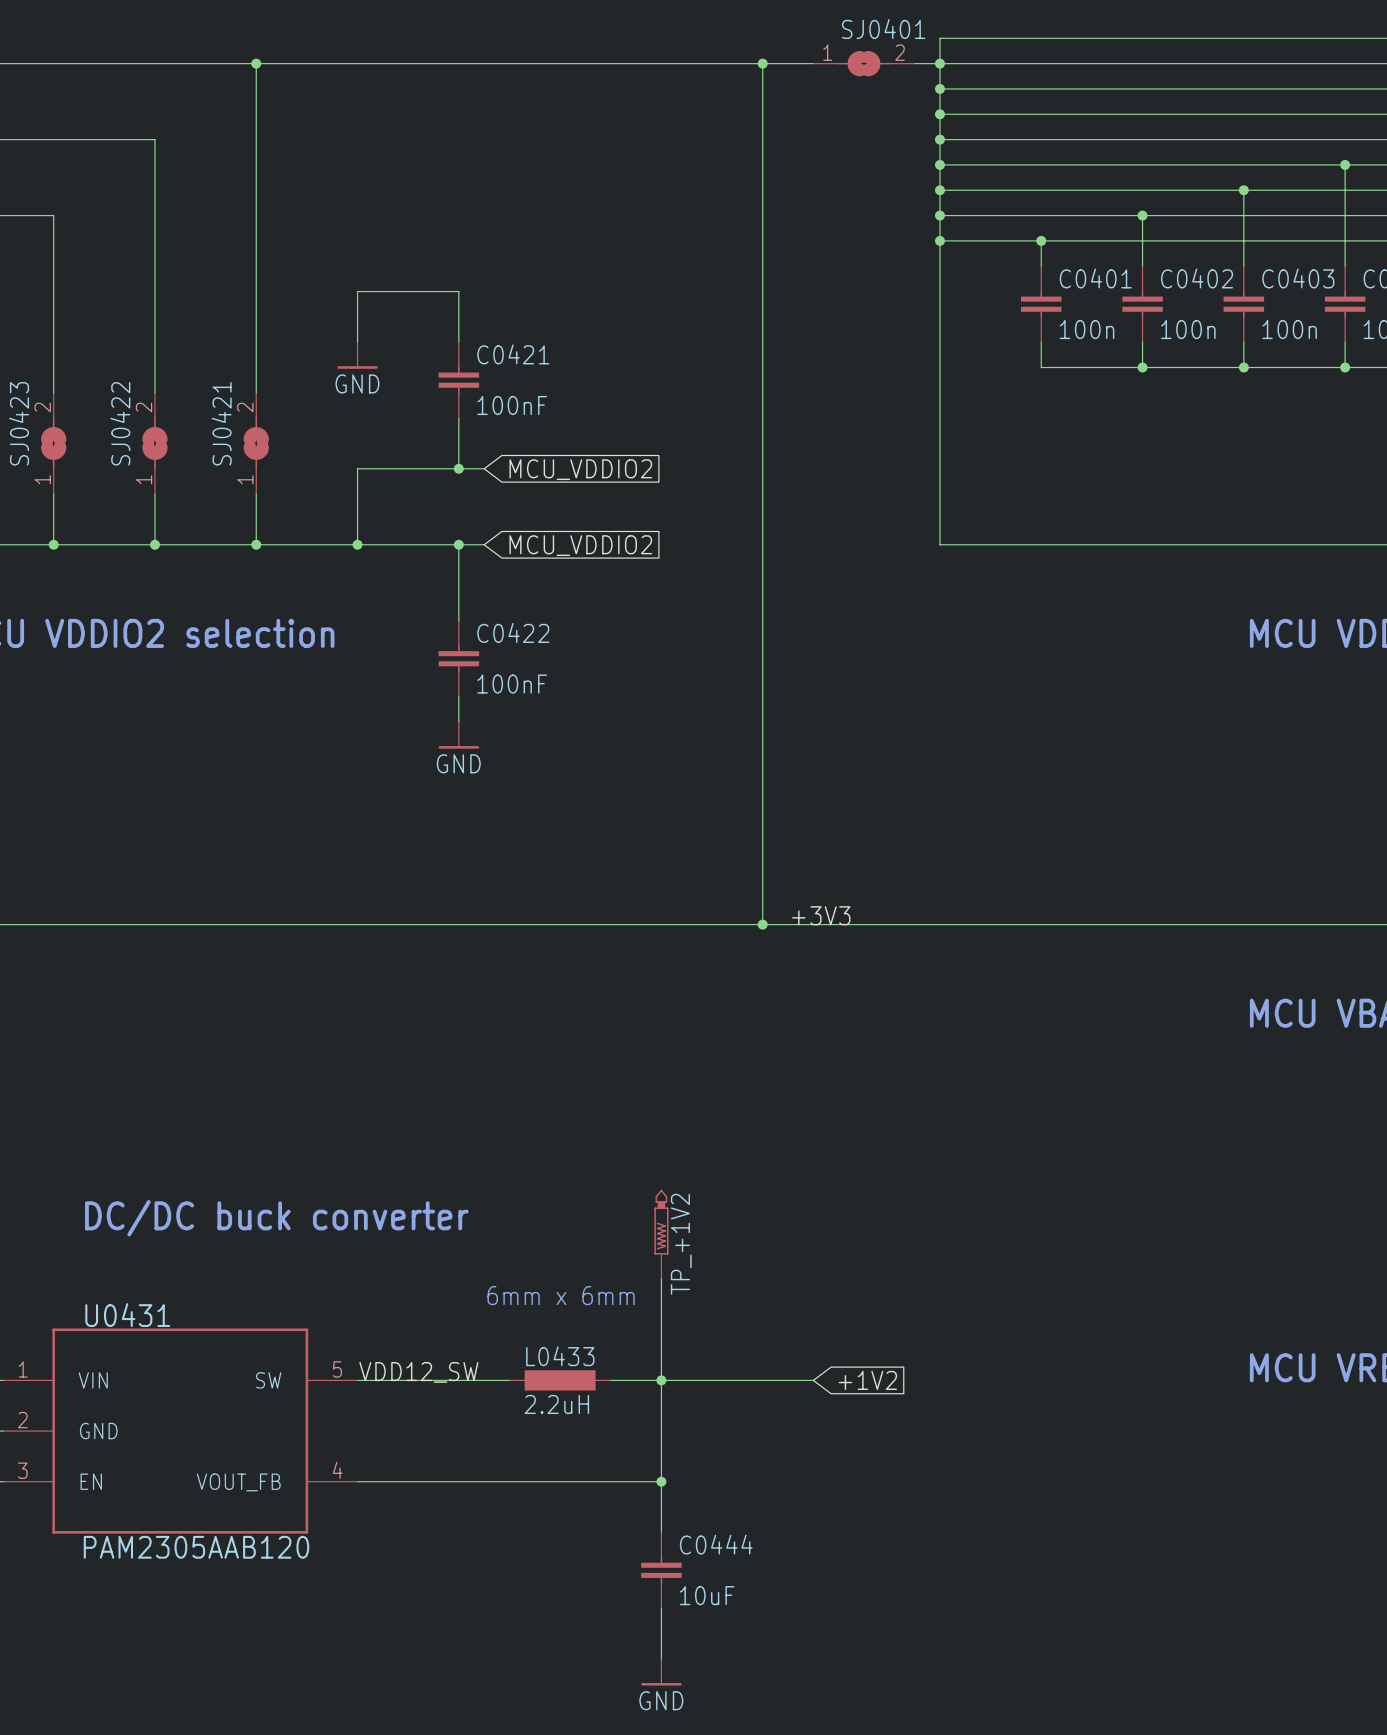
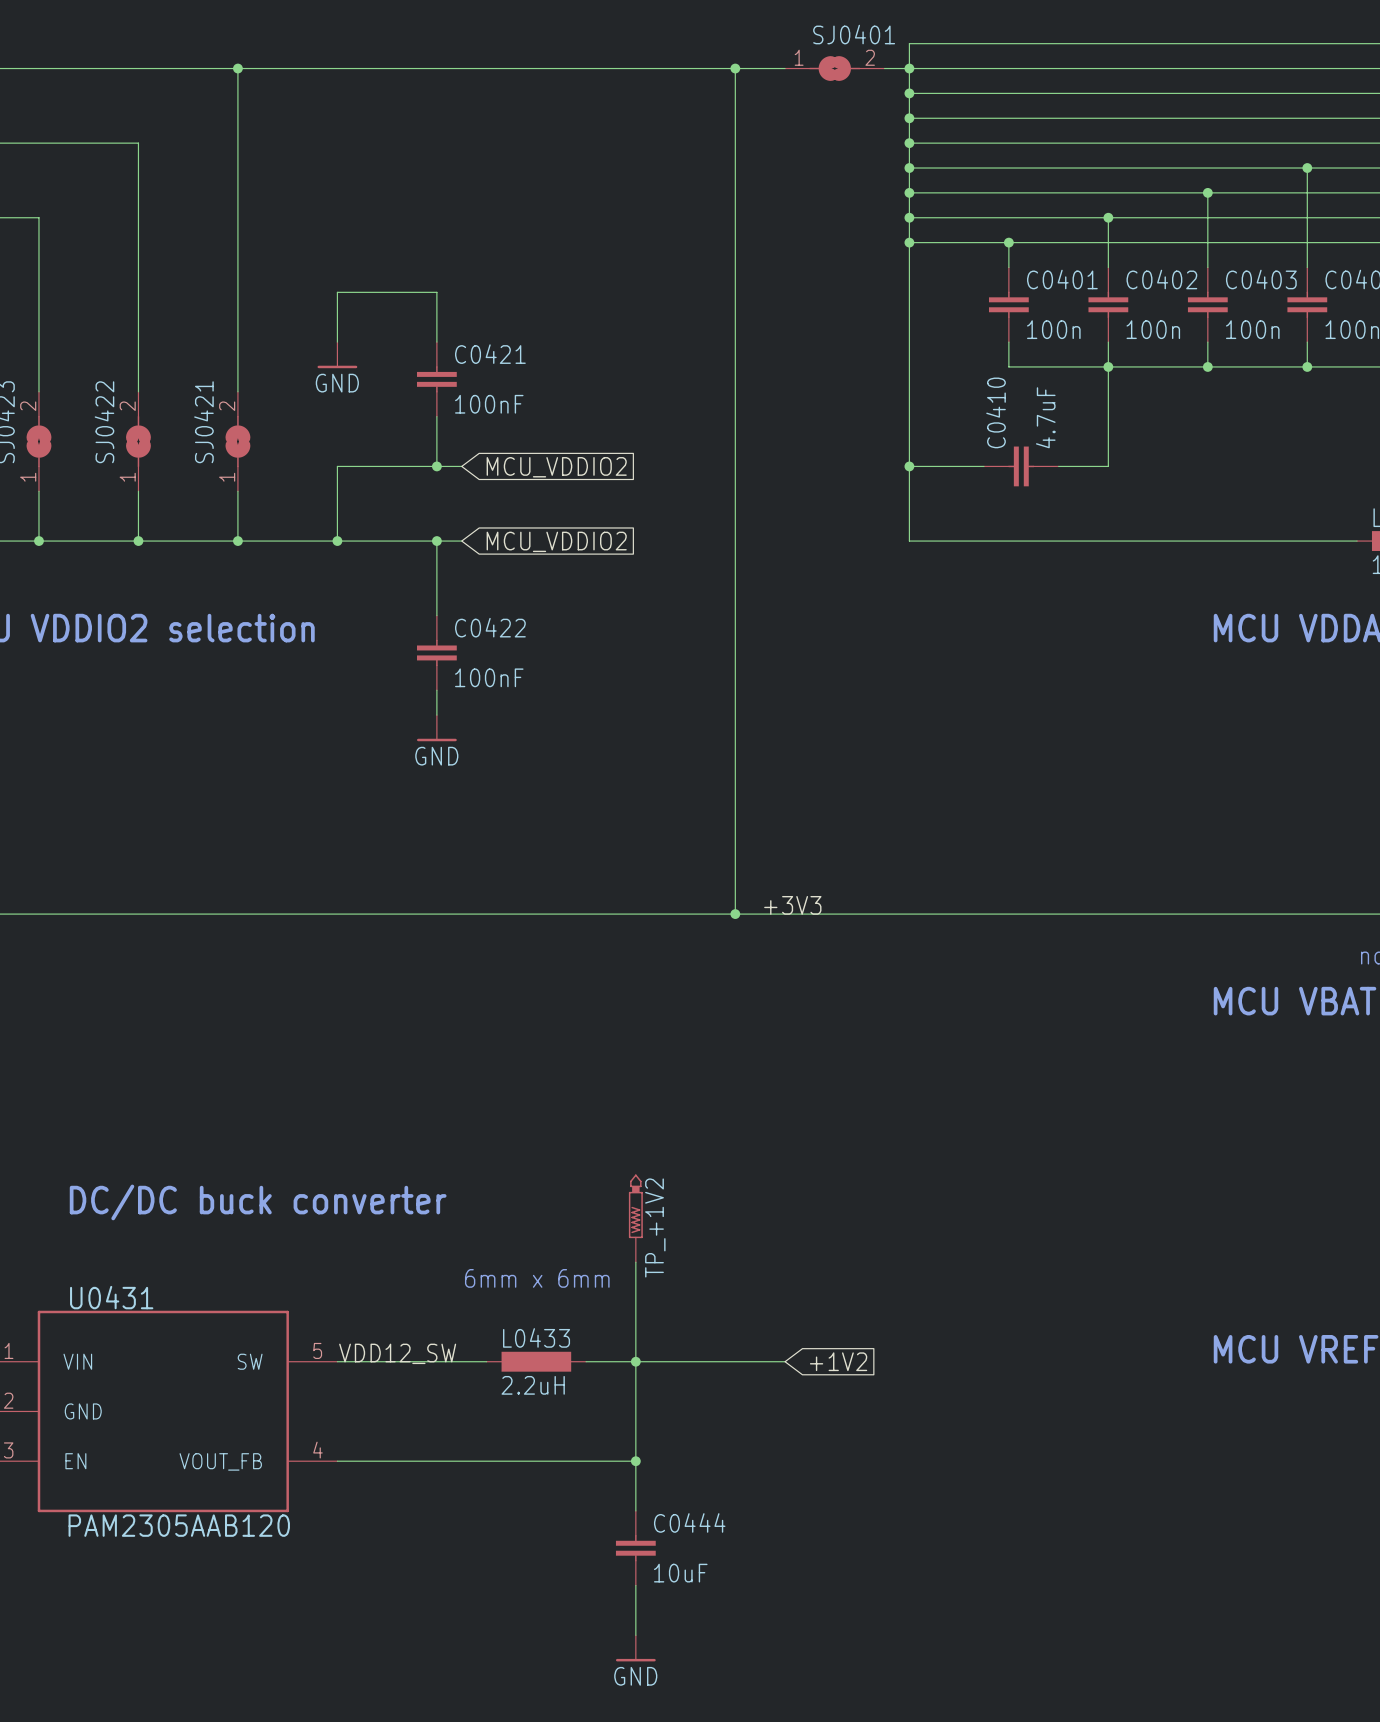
wire: none -> (1108, 366) (1108, 466) (1058, 466)
wire: none -> (909, 466) (984, 466)
junction: none -> (909, 466)
C0410: none -> 4.7uF (1021, 466)

